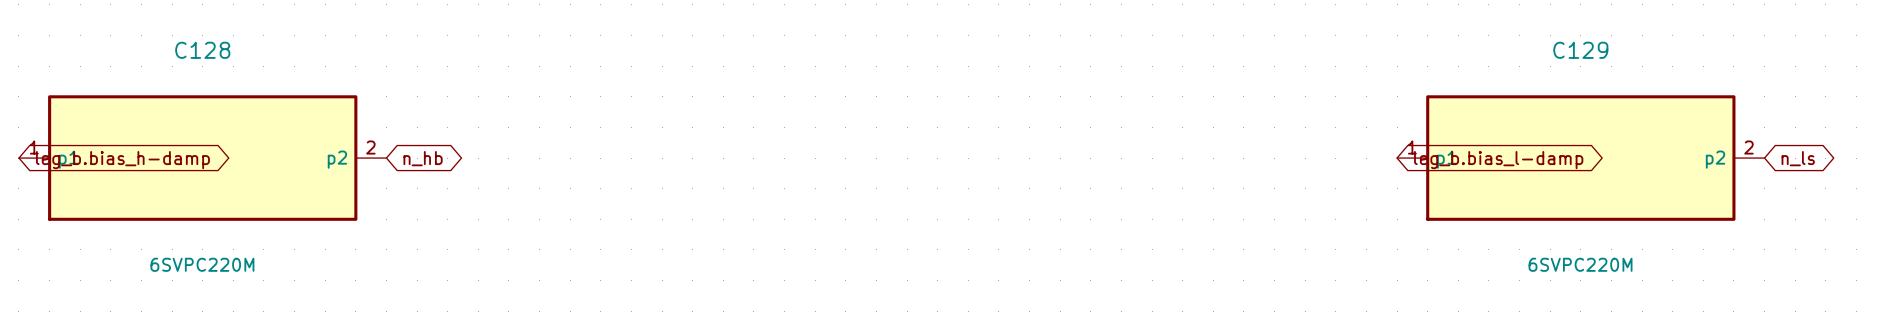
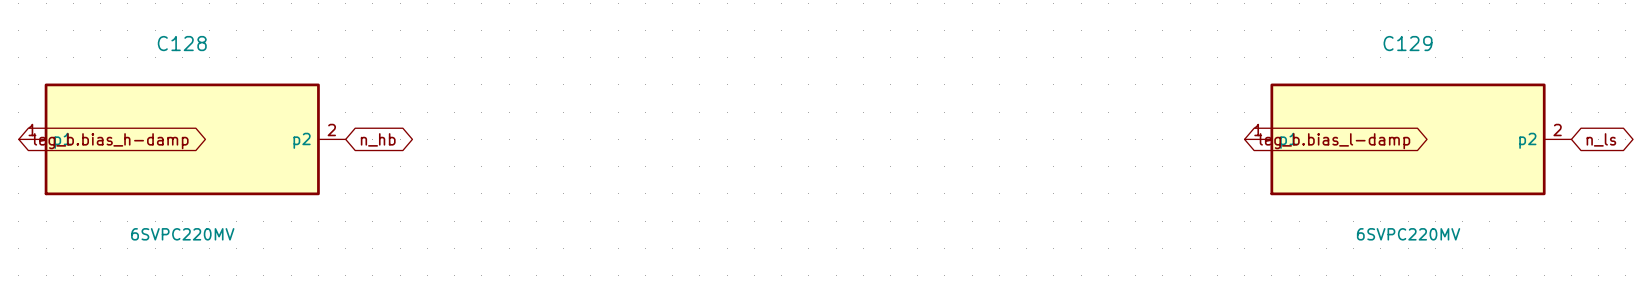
C128 value: 6SVPC220M (202, 264) -> 6SVPC220MV (182, 234)
C129 value: 6SVPC220M (1580, 264) -> 6SVPC220MV (1408, 234)

